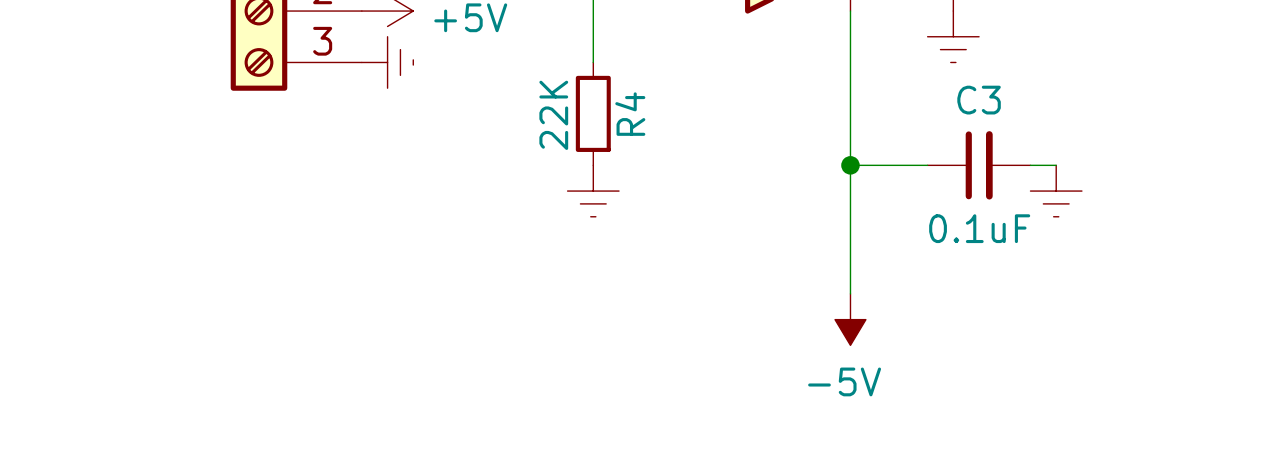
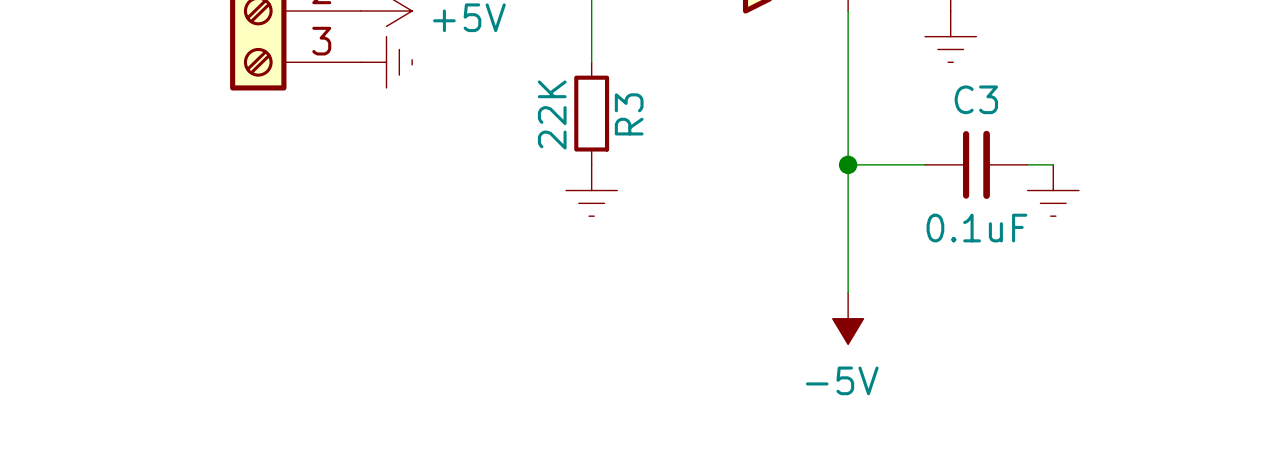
R4 name: R4 (630, 114) -> R3 (629, 114)

